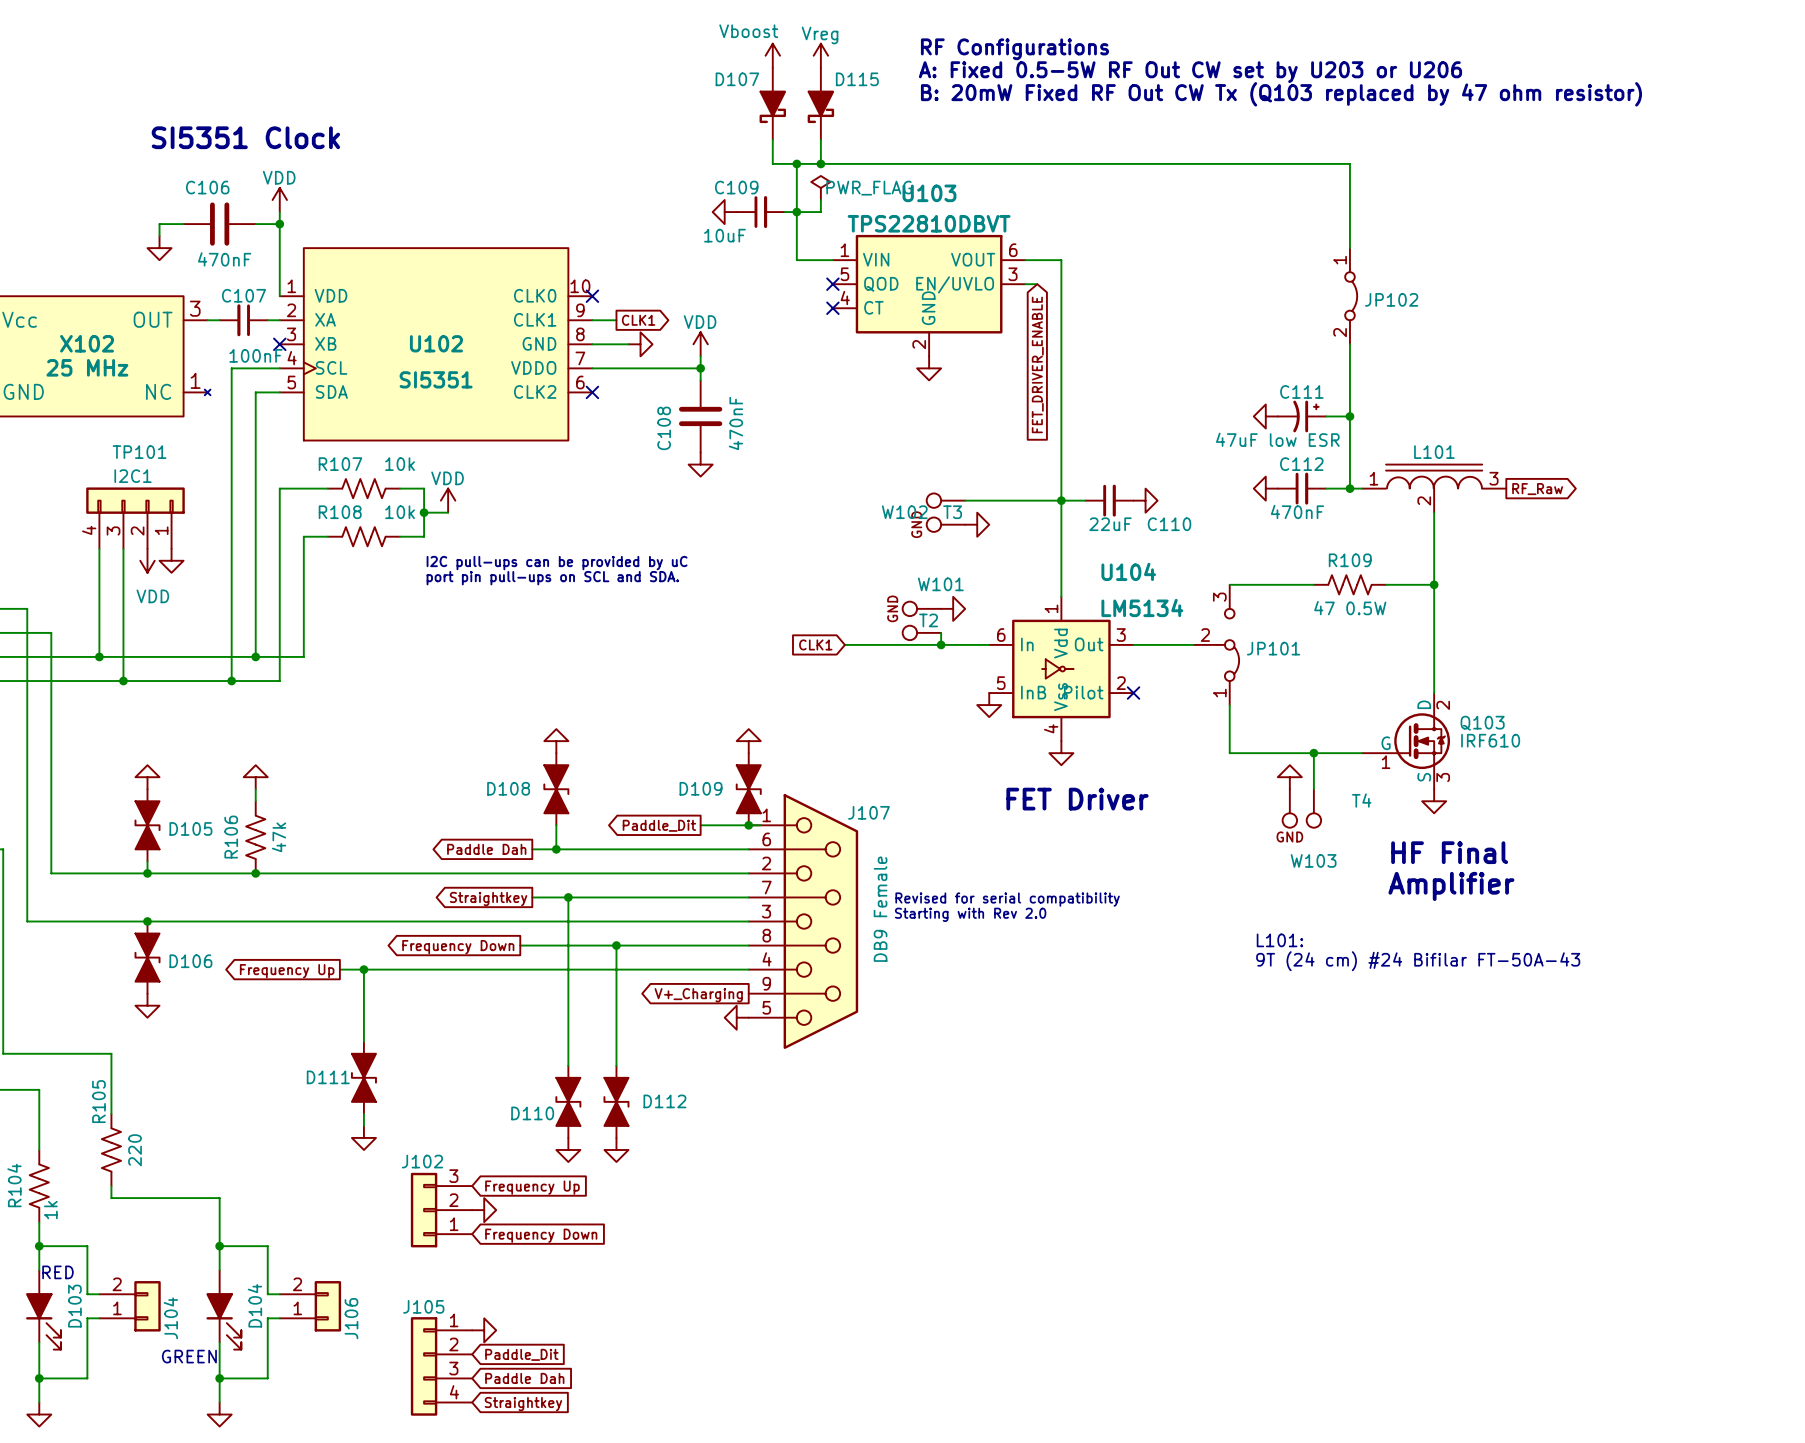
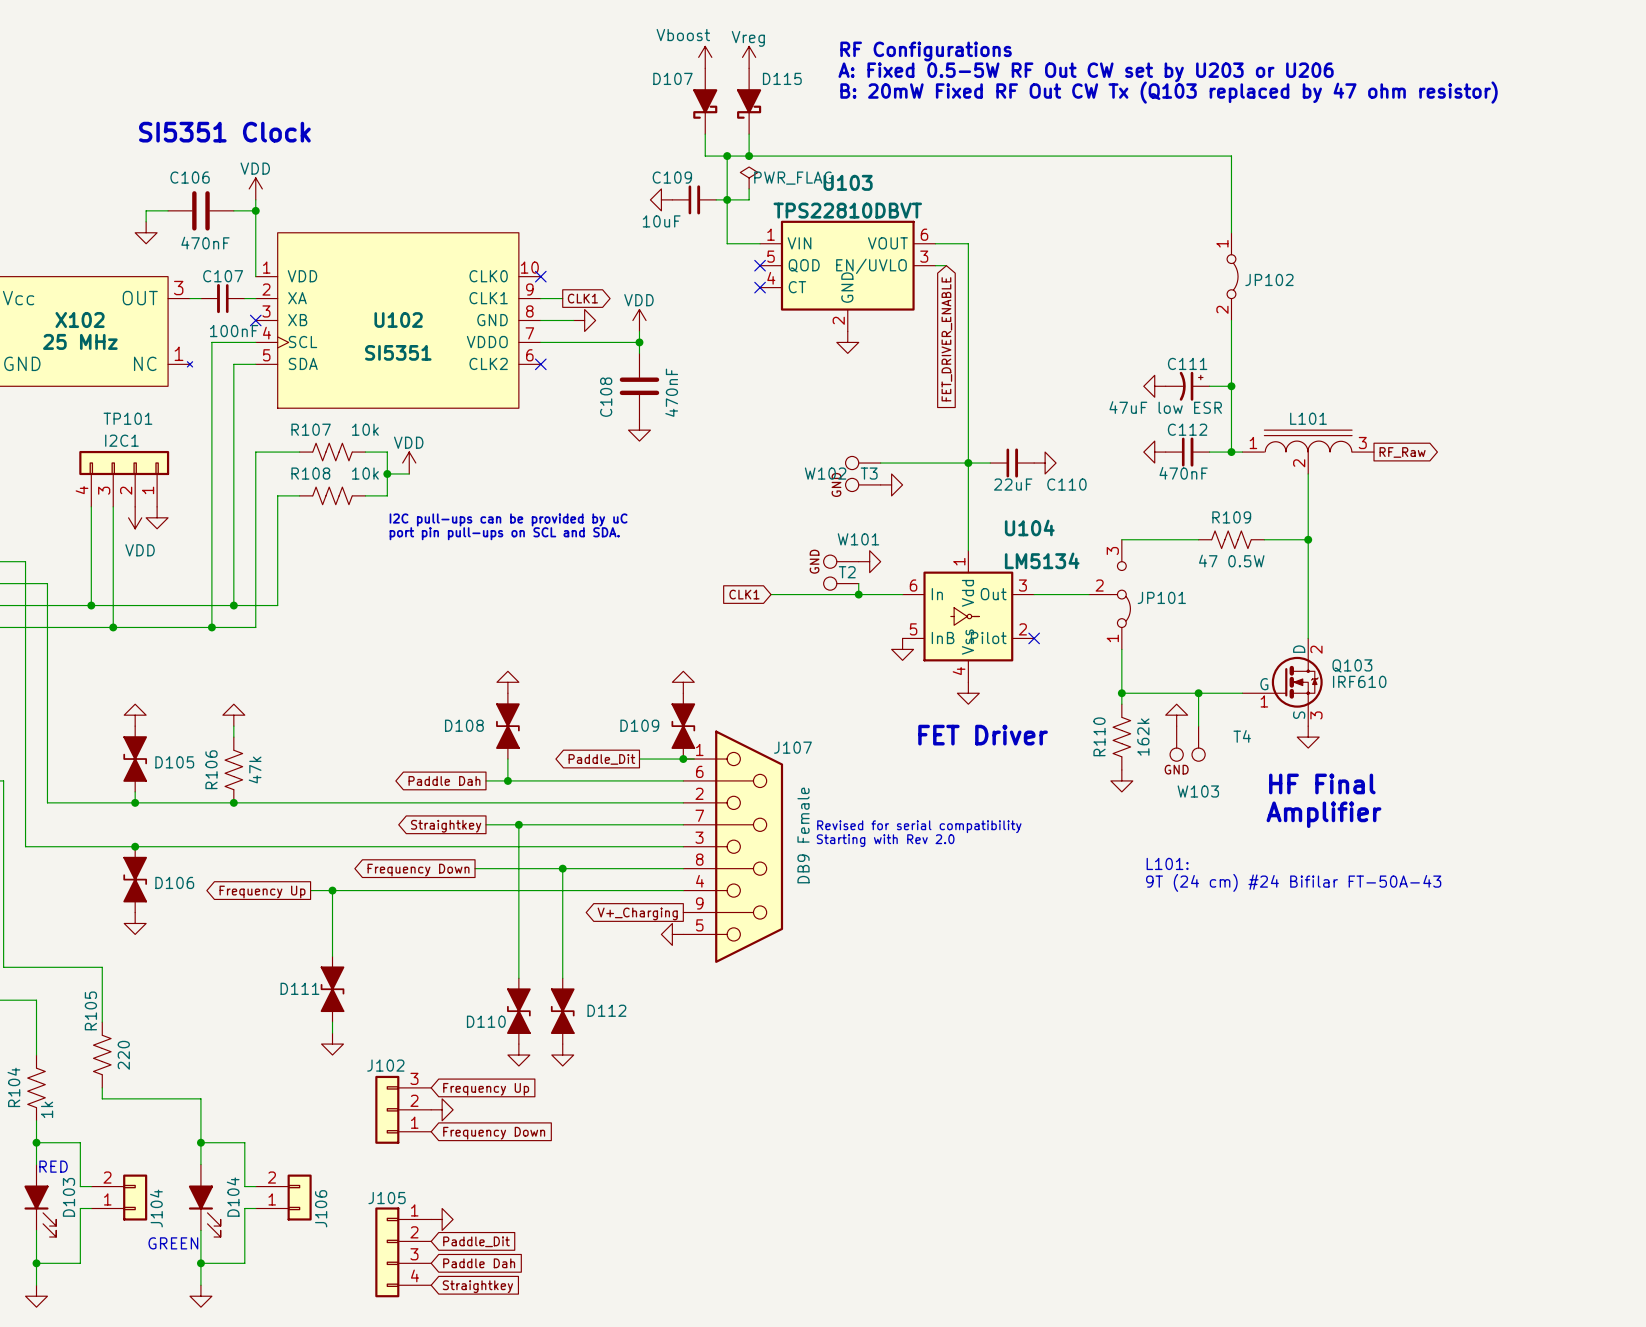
wire: none -> (1121, 693) (1121, 704)
junction: none -> (1121, 693)
R110: none -> 162k (1121, 737)
power symbol: none -> (1121, 780)

